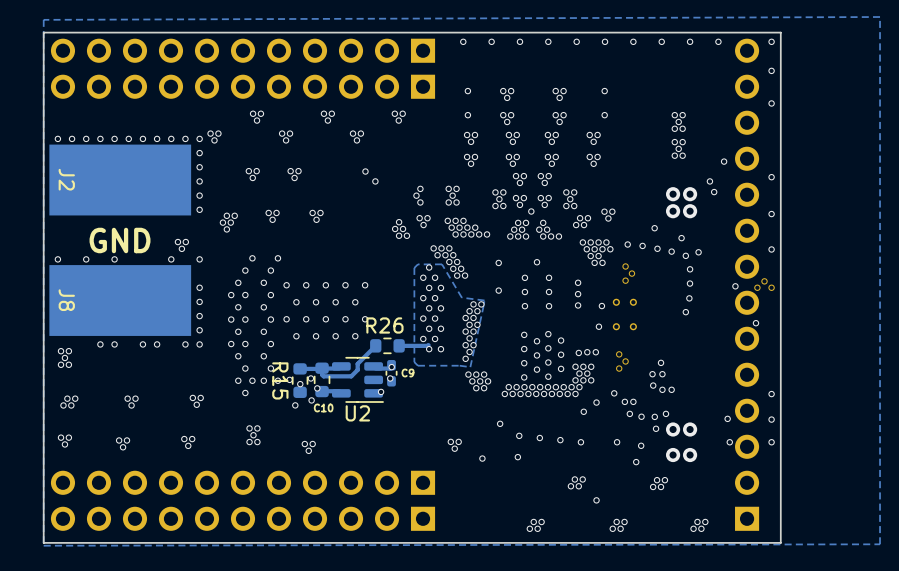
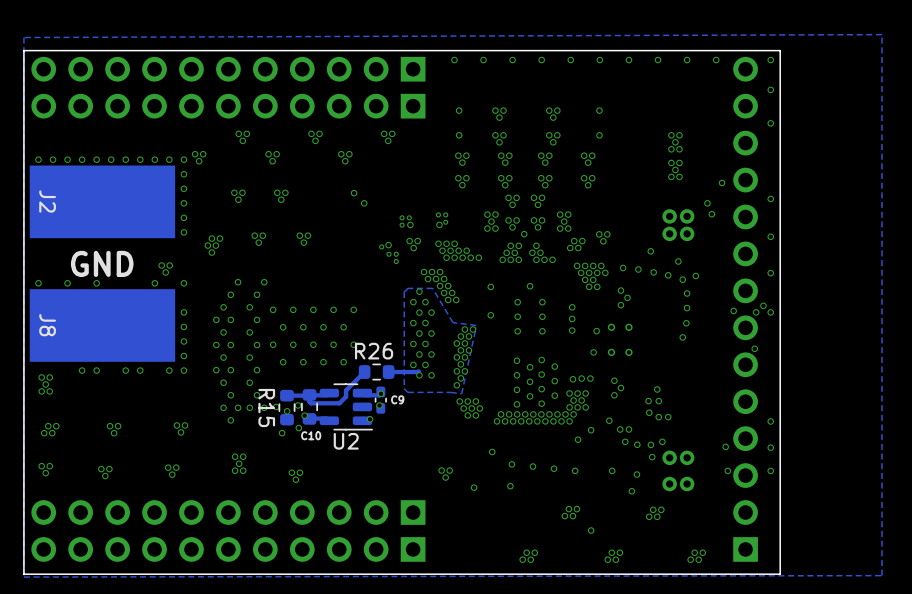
via: (420, 188) -> none
via: (448, 188) -> none
via: (456, 188) -> none
via: none -> (438, 214)
via: none -> (445, 214)
via: none -> (402, 217)
via: (416, 195) -> none
via: none -> (409, 217)
via: (452, 195) -> none
via: none -> (445, 222)
via: none -> (402, 225)
via: (456, 202) -> none
via: none -> (381, 246)
via: (395, 228) -> none
via: (403, 228) -> none
via: none -> (388, 254)
via: none -> (396, 254)
via: (399, 235) -> none
via: (406, 235) -> none
via: none -> (396, 261)

